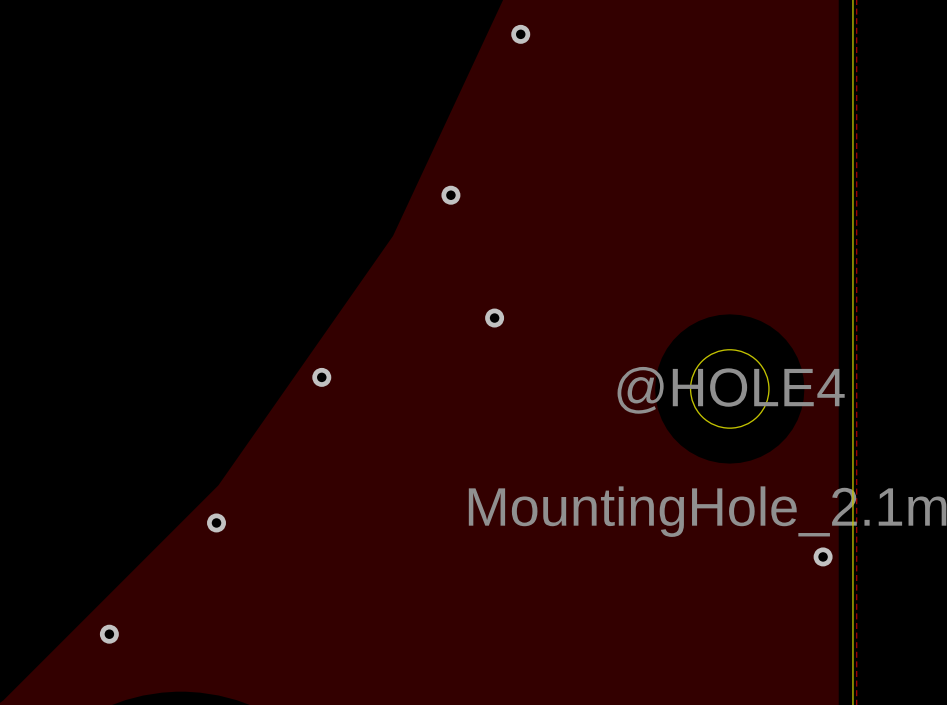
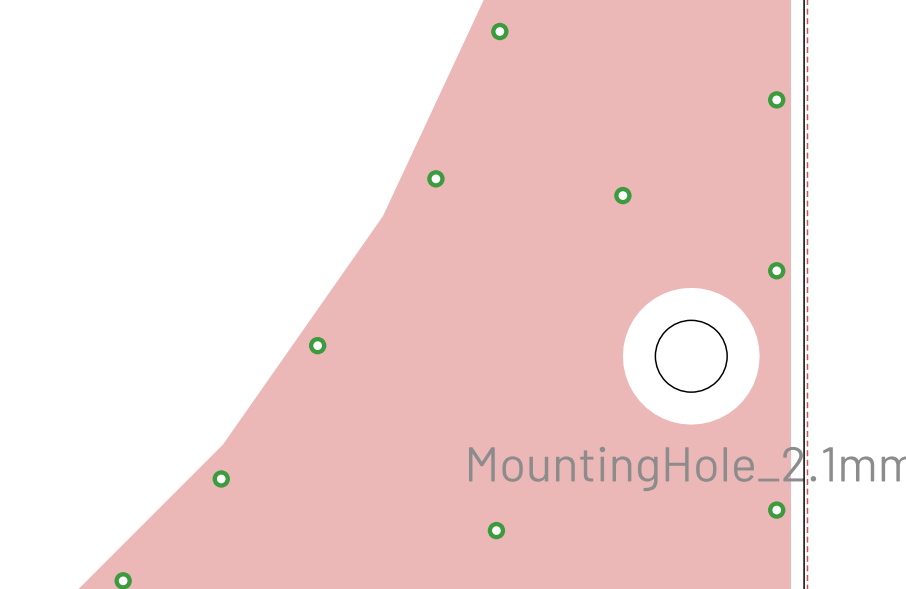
via: none -> (776, 99)
via: none -> (622, 195)
via: none -> (776, 270)
via: (494, 318) -> none
@HOLE4 name: @HOLE4 (731, 390) -> none
via: none -> (496, 530)

